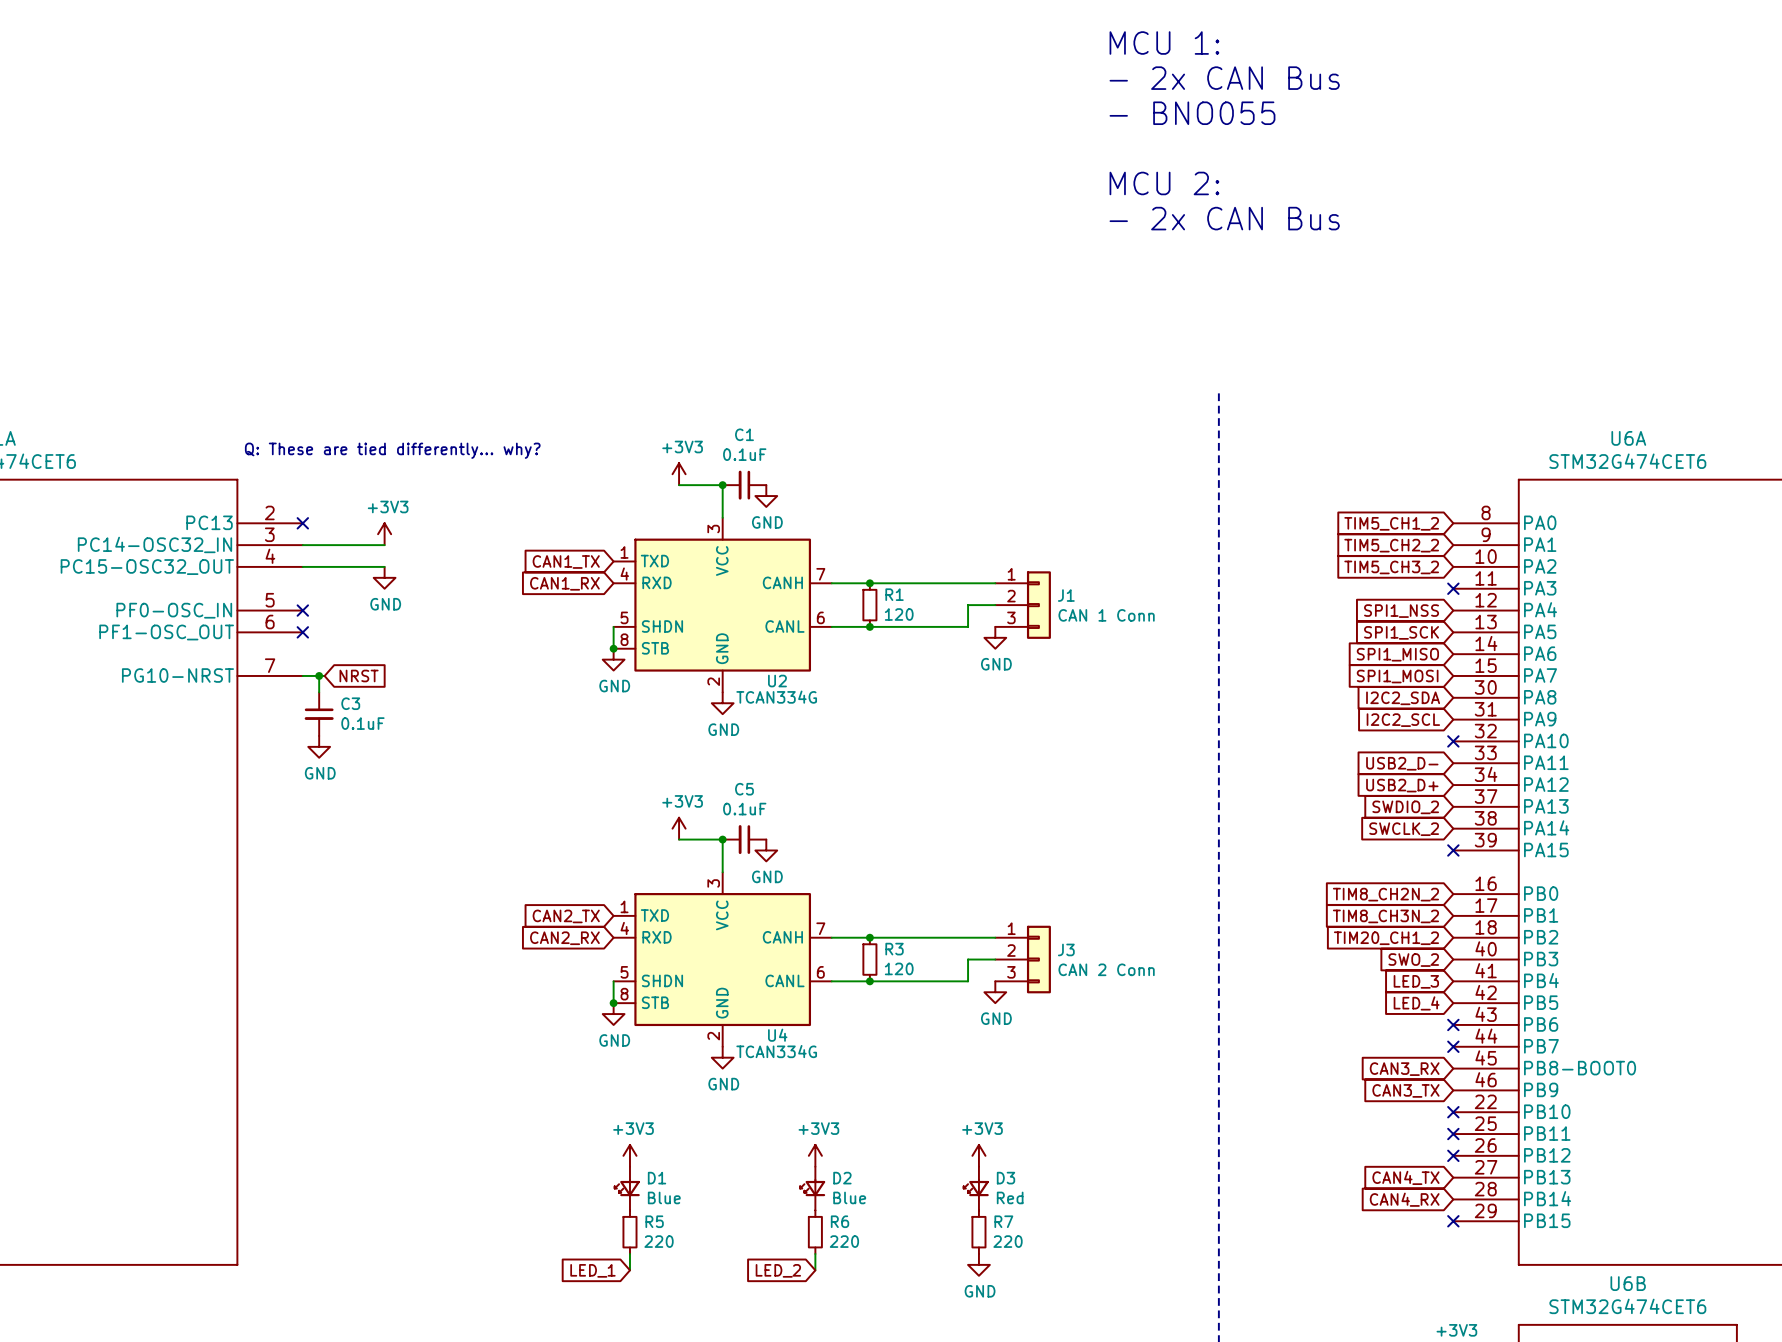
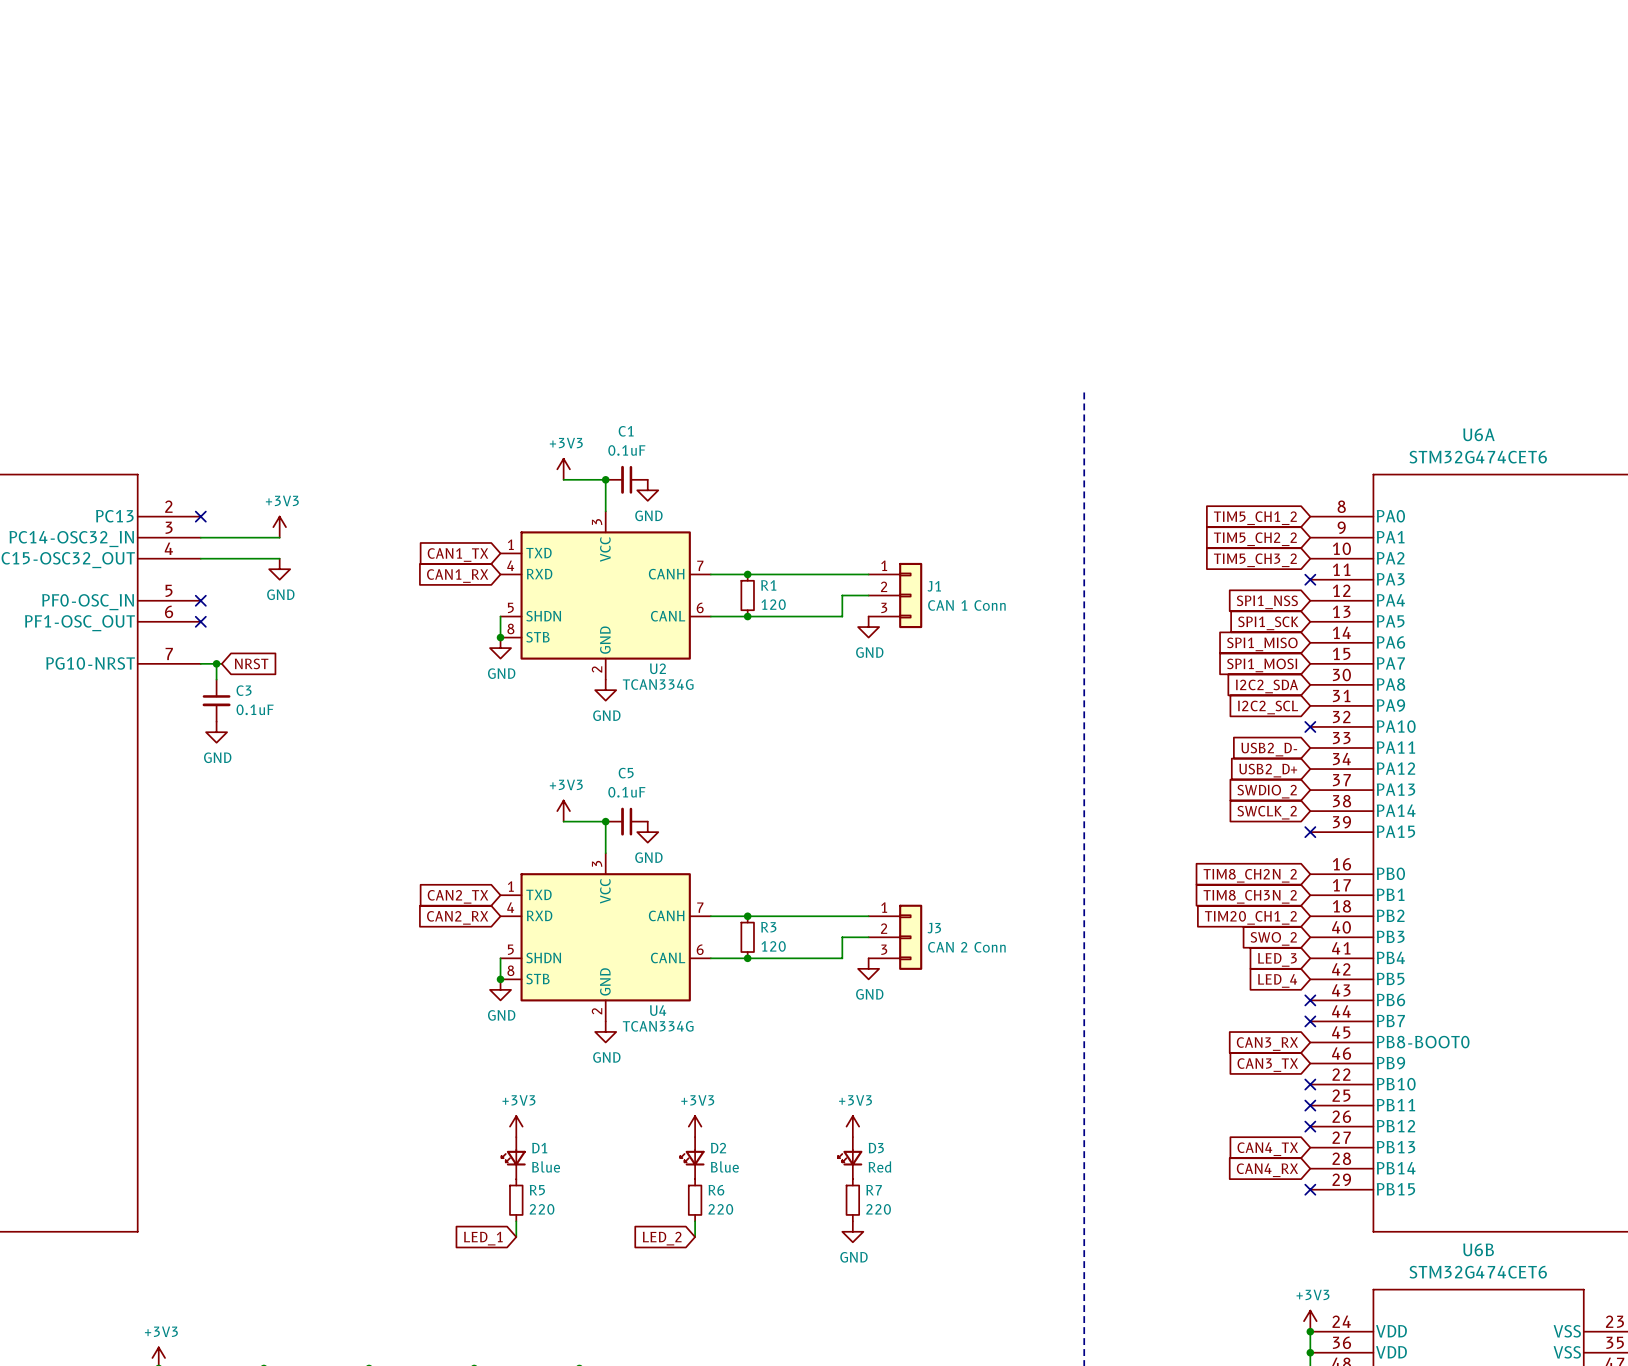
text: MCU 1: (1164, 43) -> none
text: - 2x CAN Bus (1224, 78) -> none
text: - BNO055 (1192, 113) -> none
text: MCU 2: (1164, 183) -> none
text: - 2x CAN Bus (1224, 218) -> none
text: Q: These are tied differently... why? (392, 450) -> none

